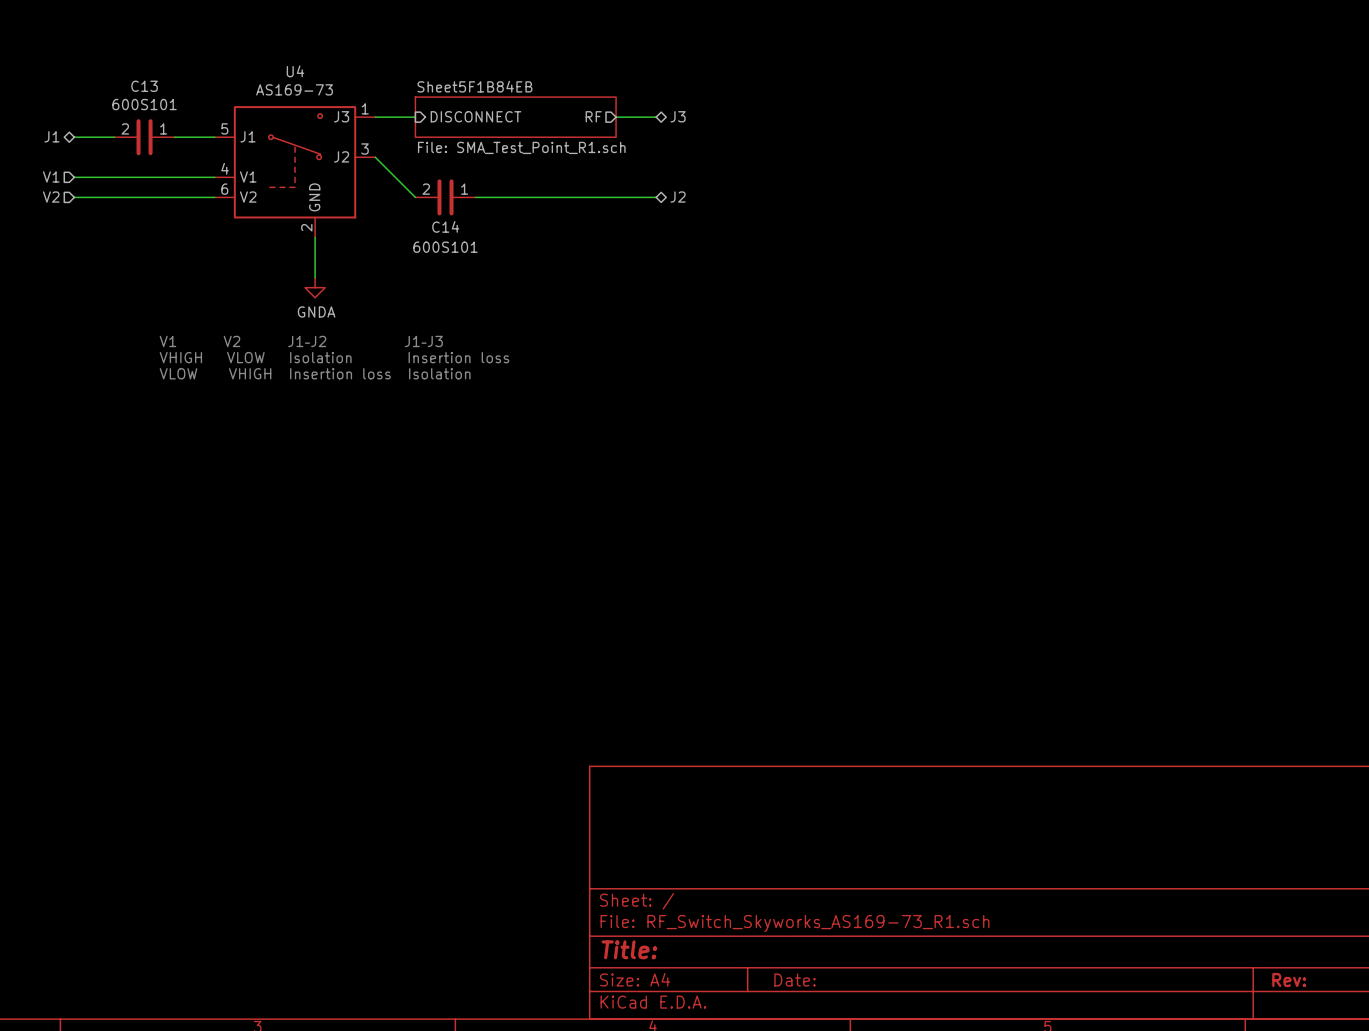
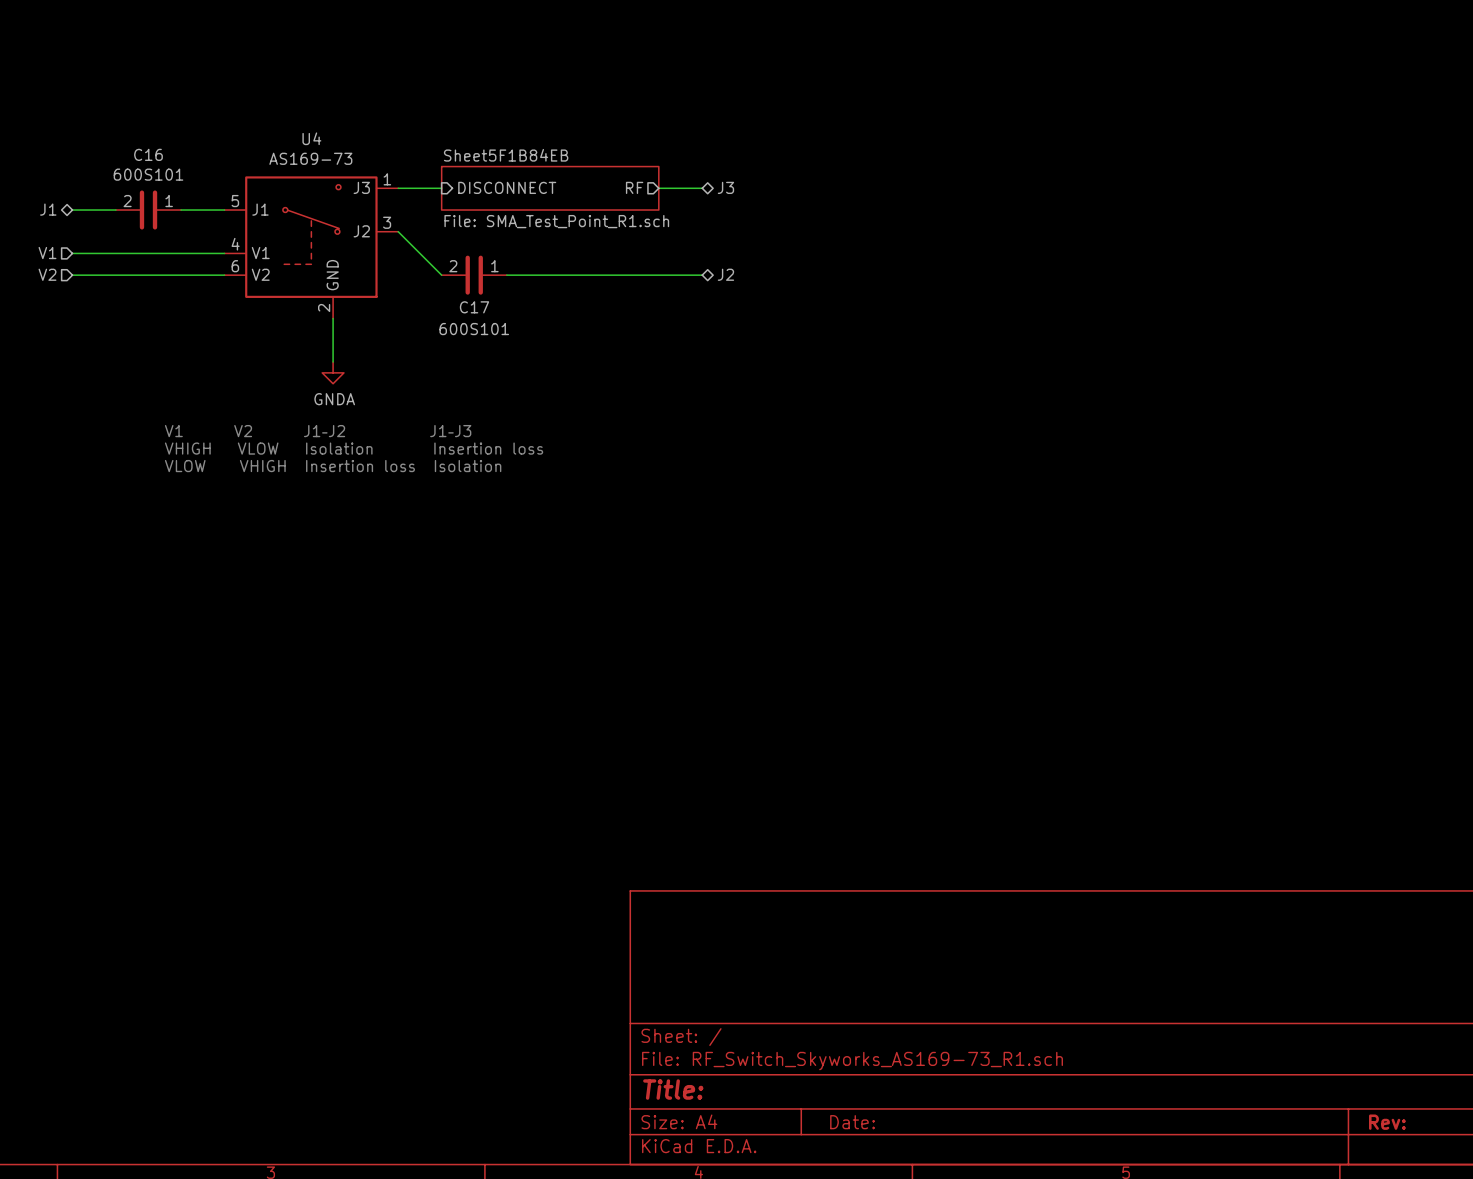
C13 name: C13 (144, 86) -> C16 (148, 154)
C14 name: C14 (445, 226) -> C17 (474, 307)

